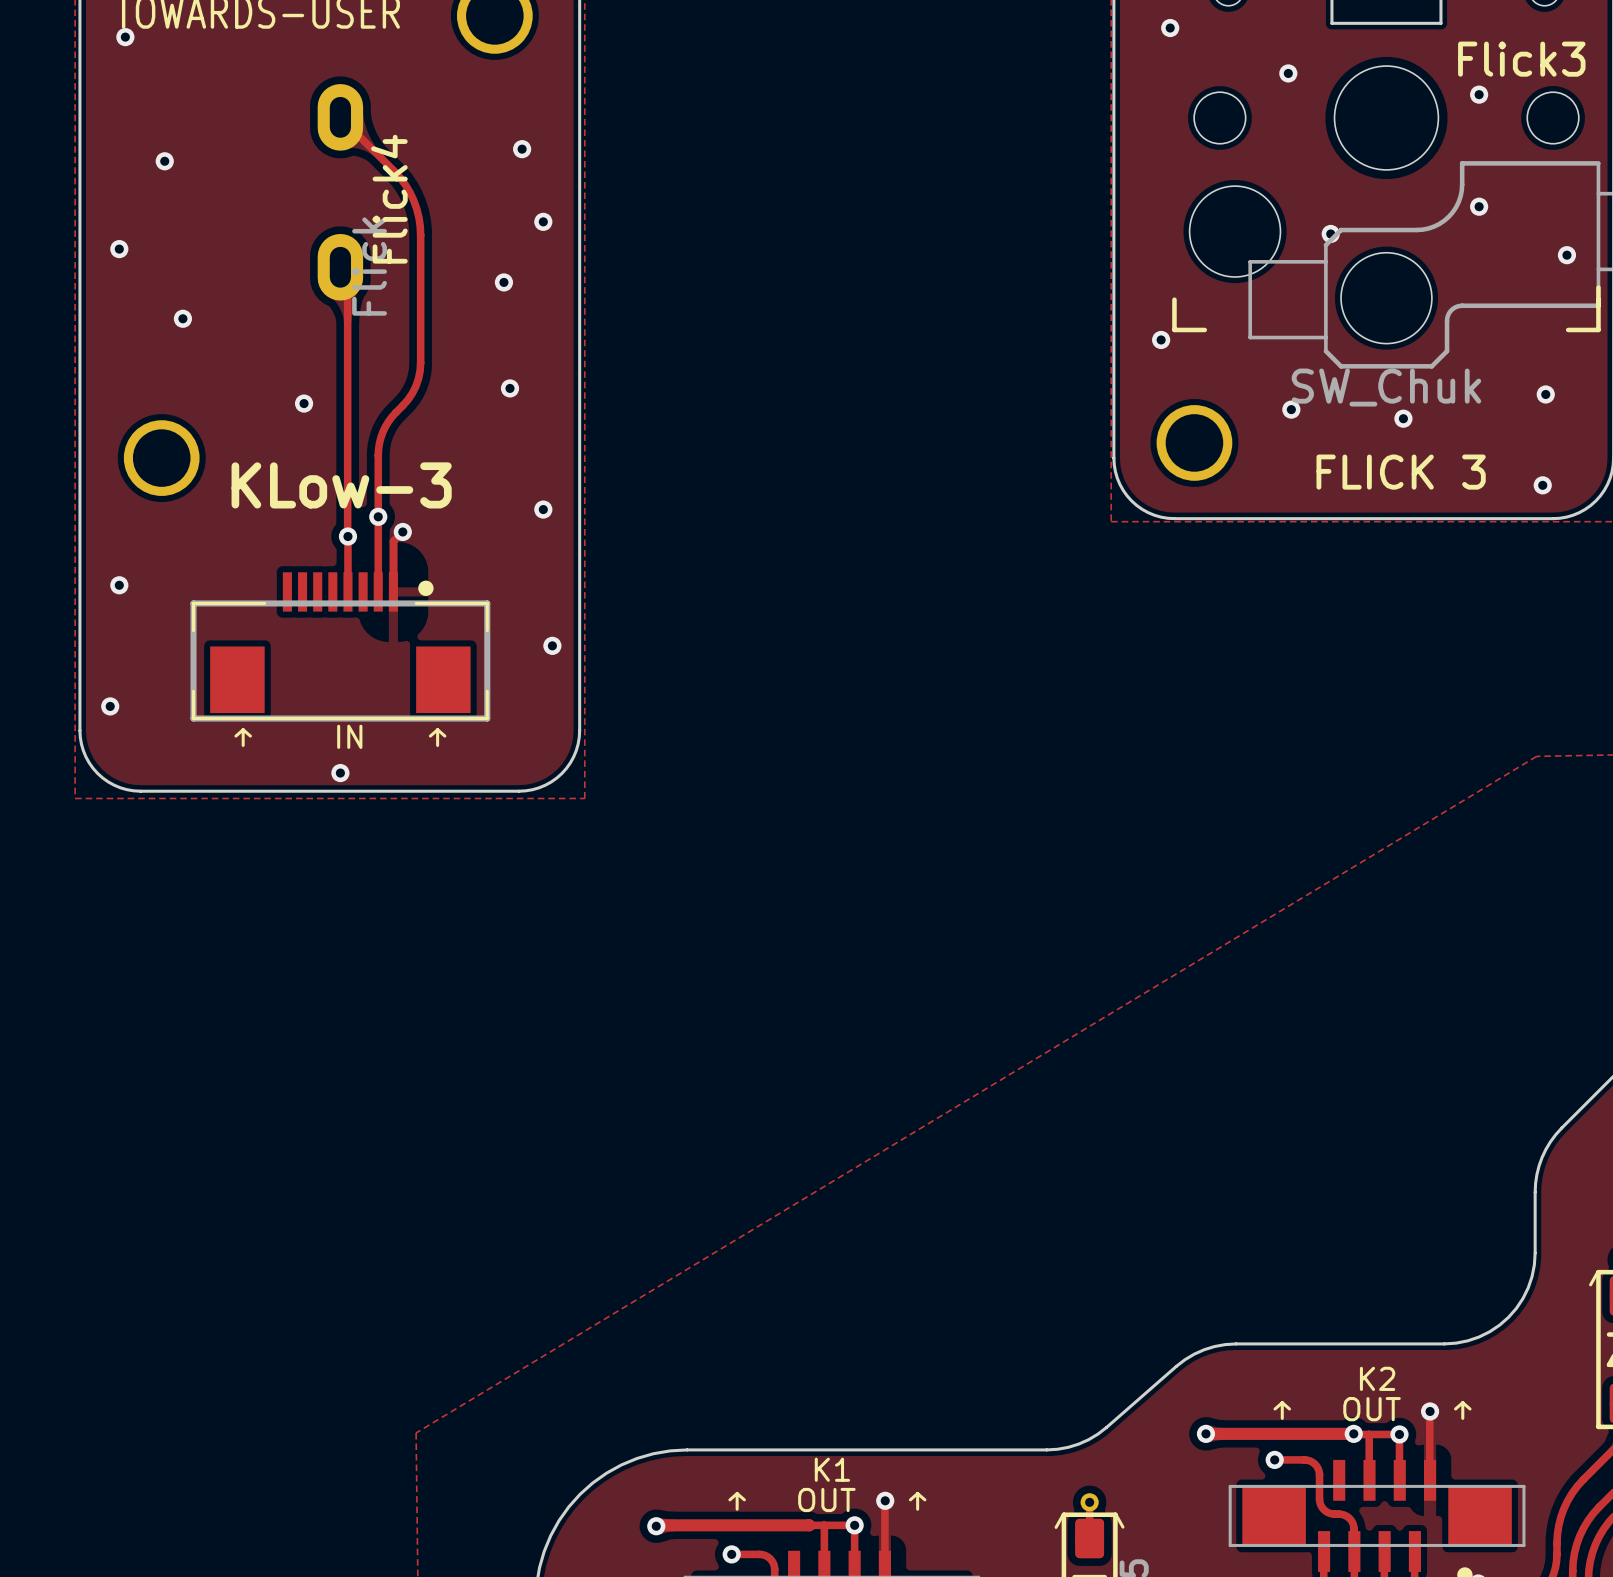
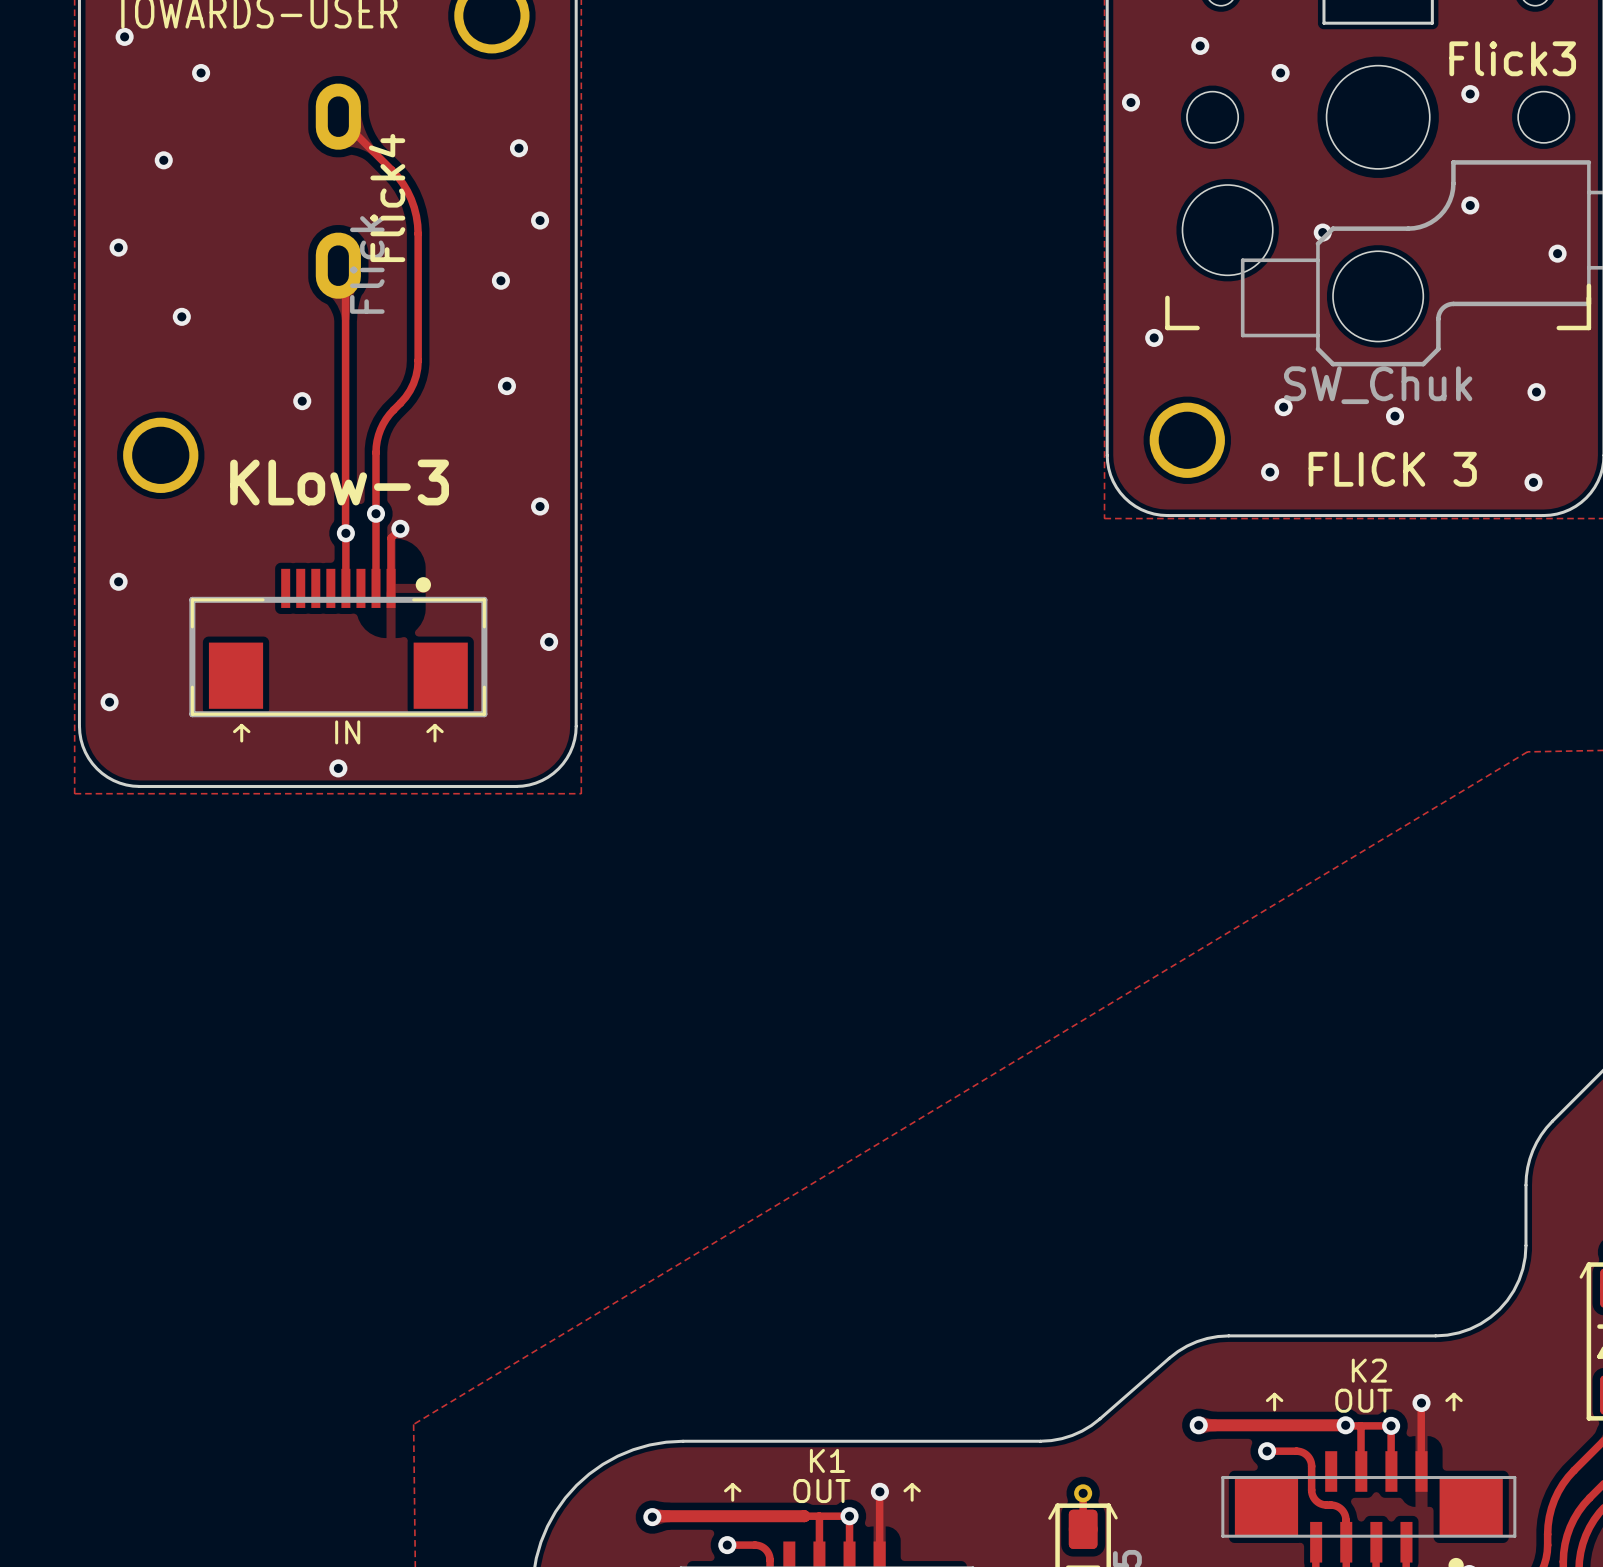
via: (1170, 28) -> none
via: none -> (1200, 45)
via: none -> (201, 73)
via: none -> (1131, 102)
via: none -> (1270, 472)

